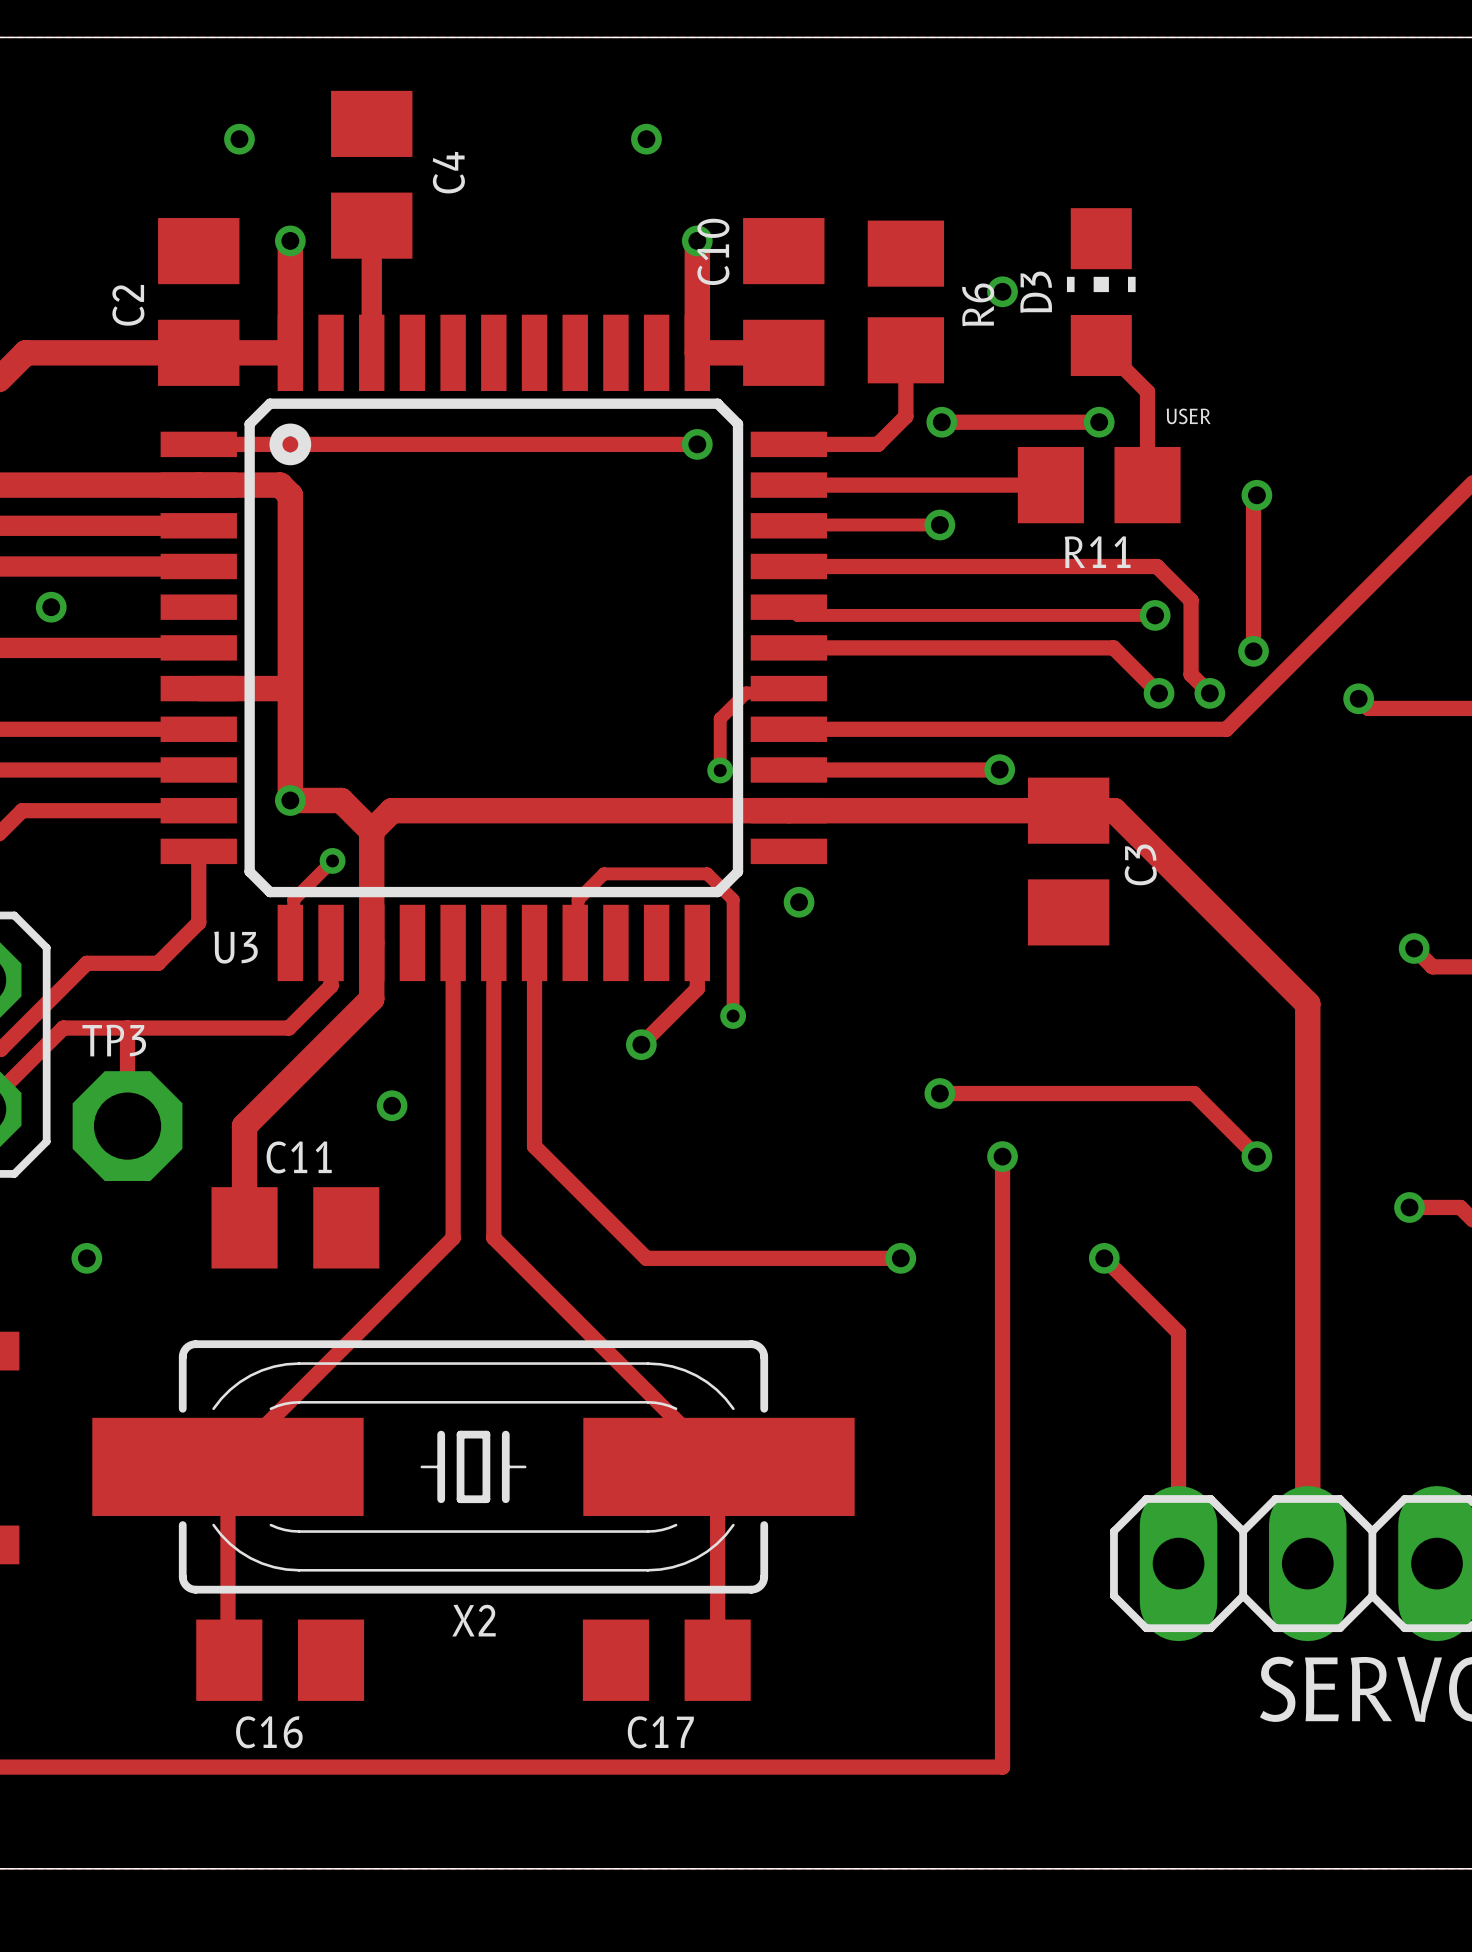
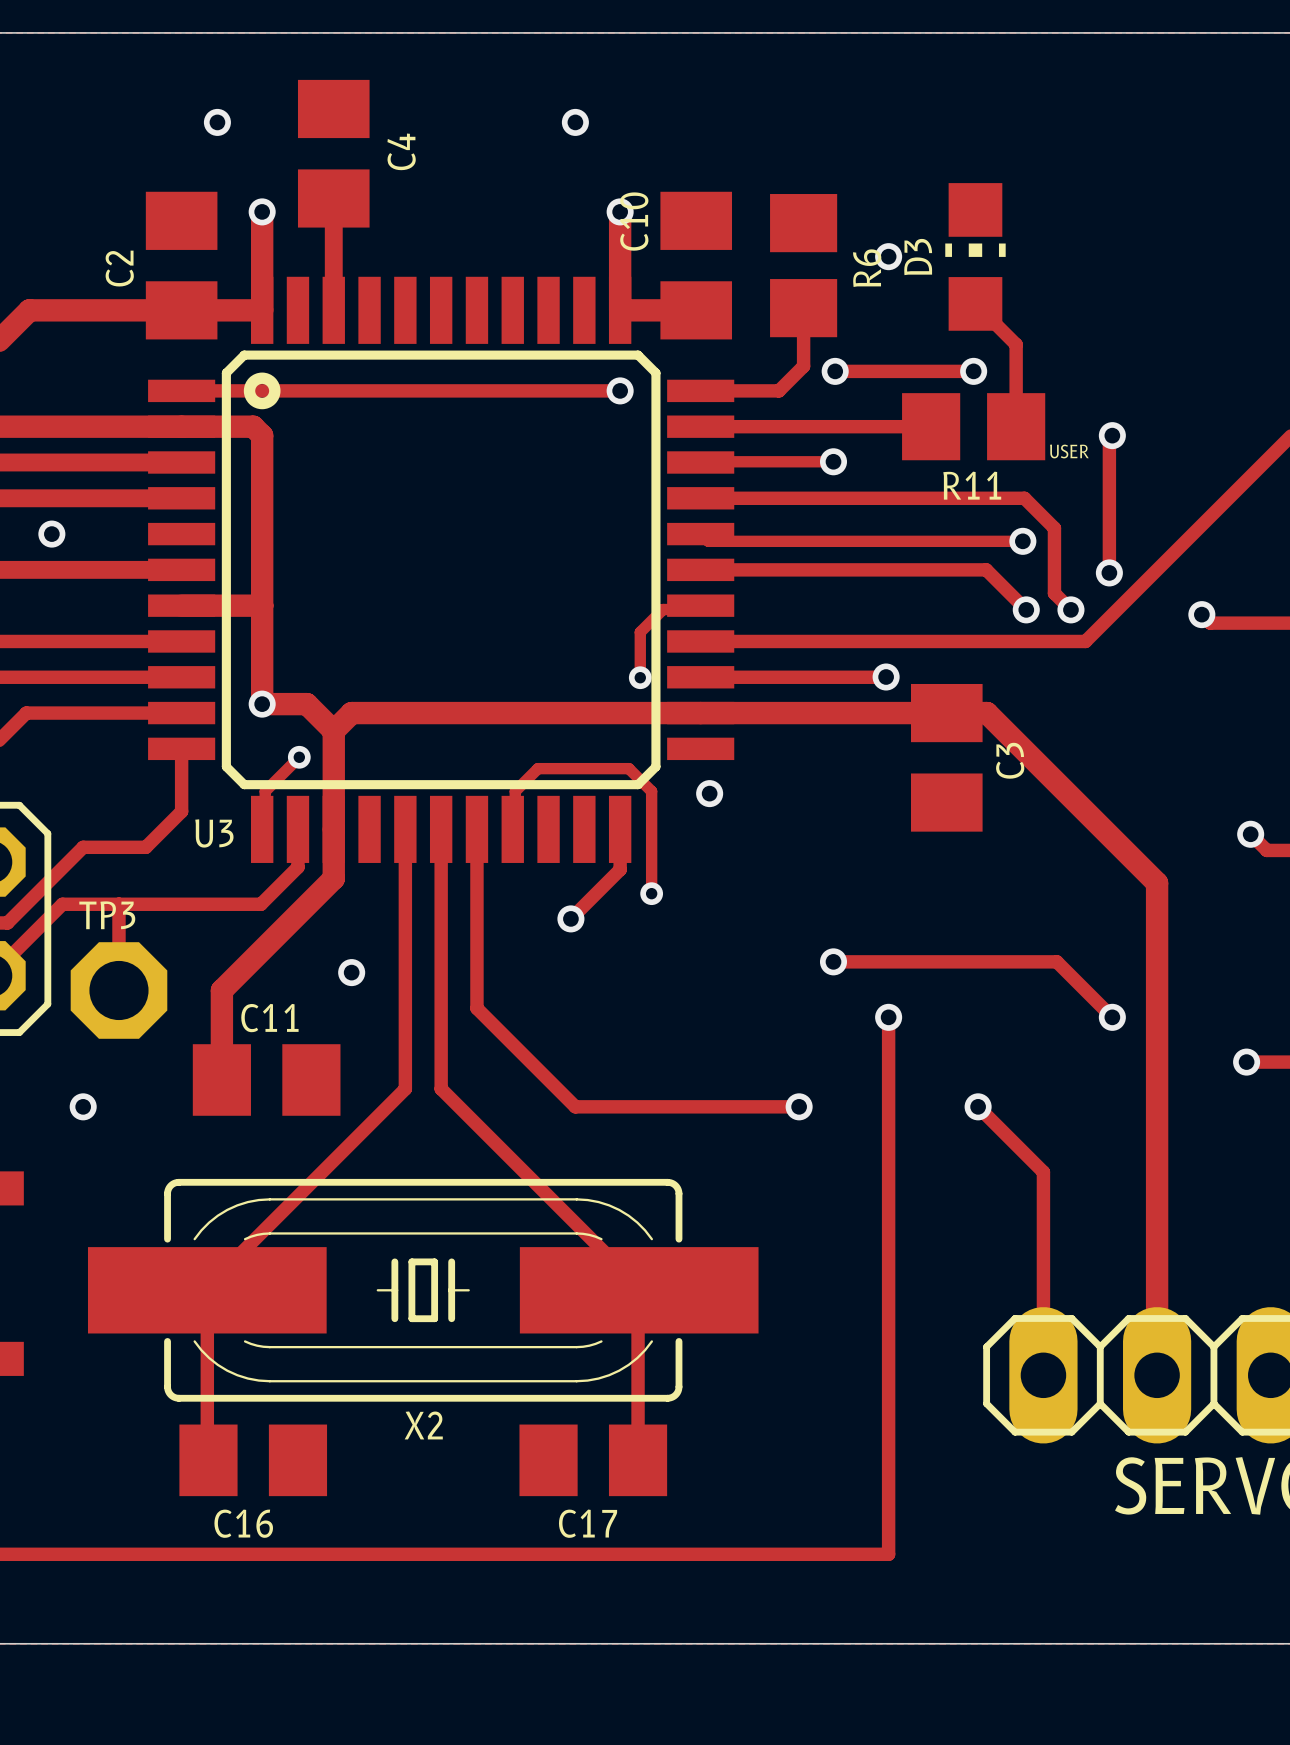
text position: USER (1188, 416) -> USER (1069, 451)

